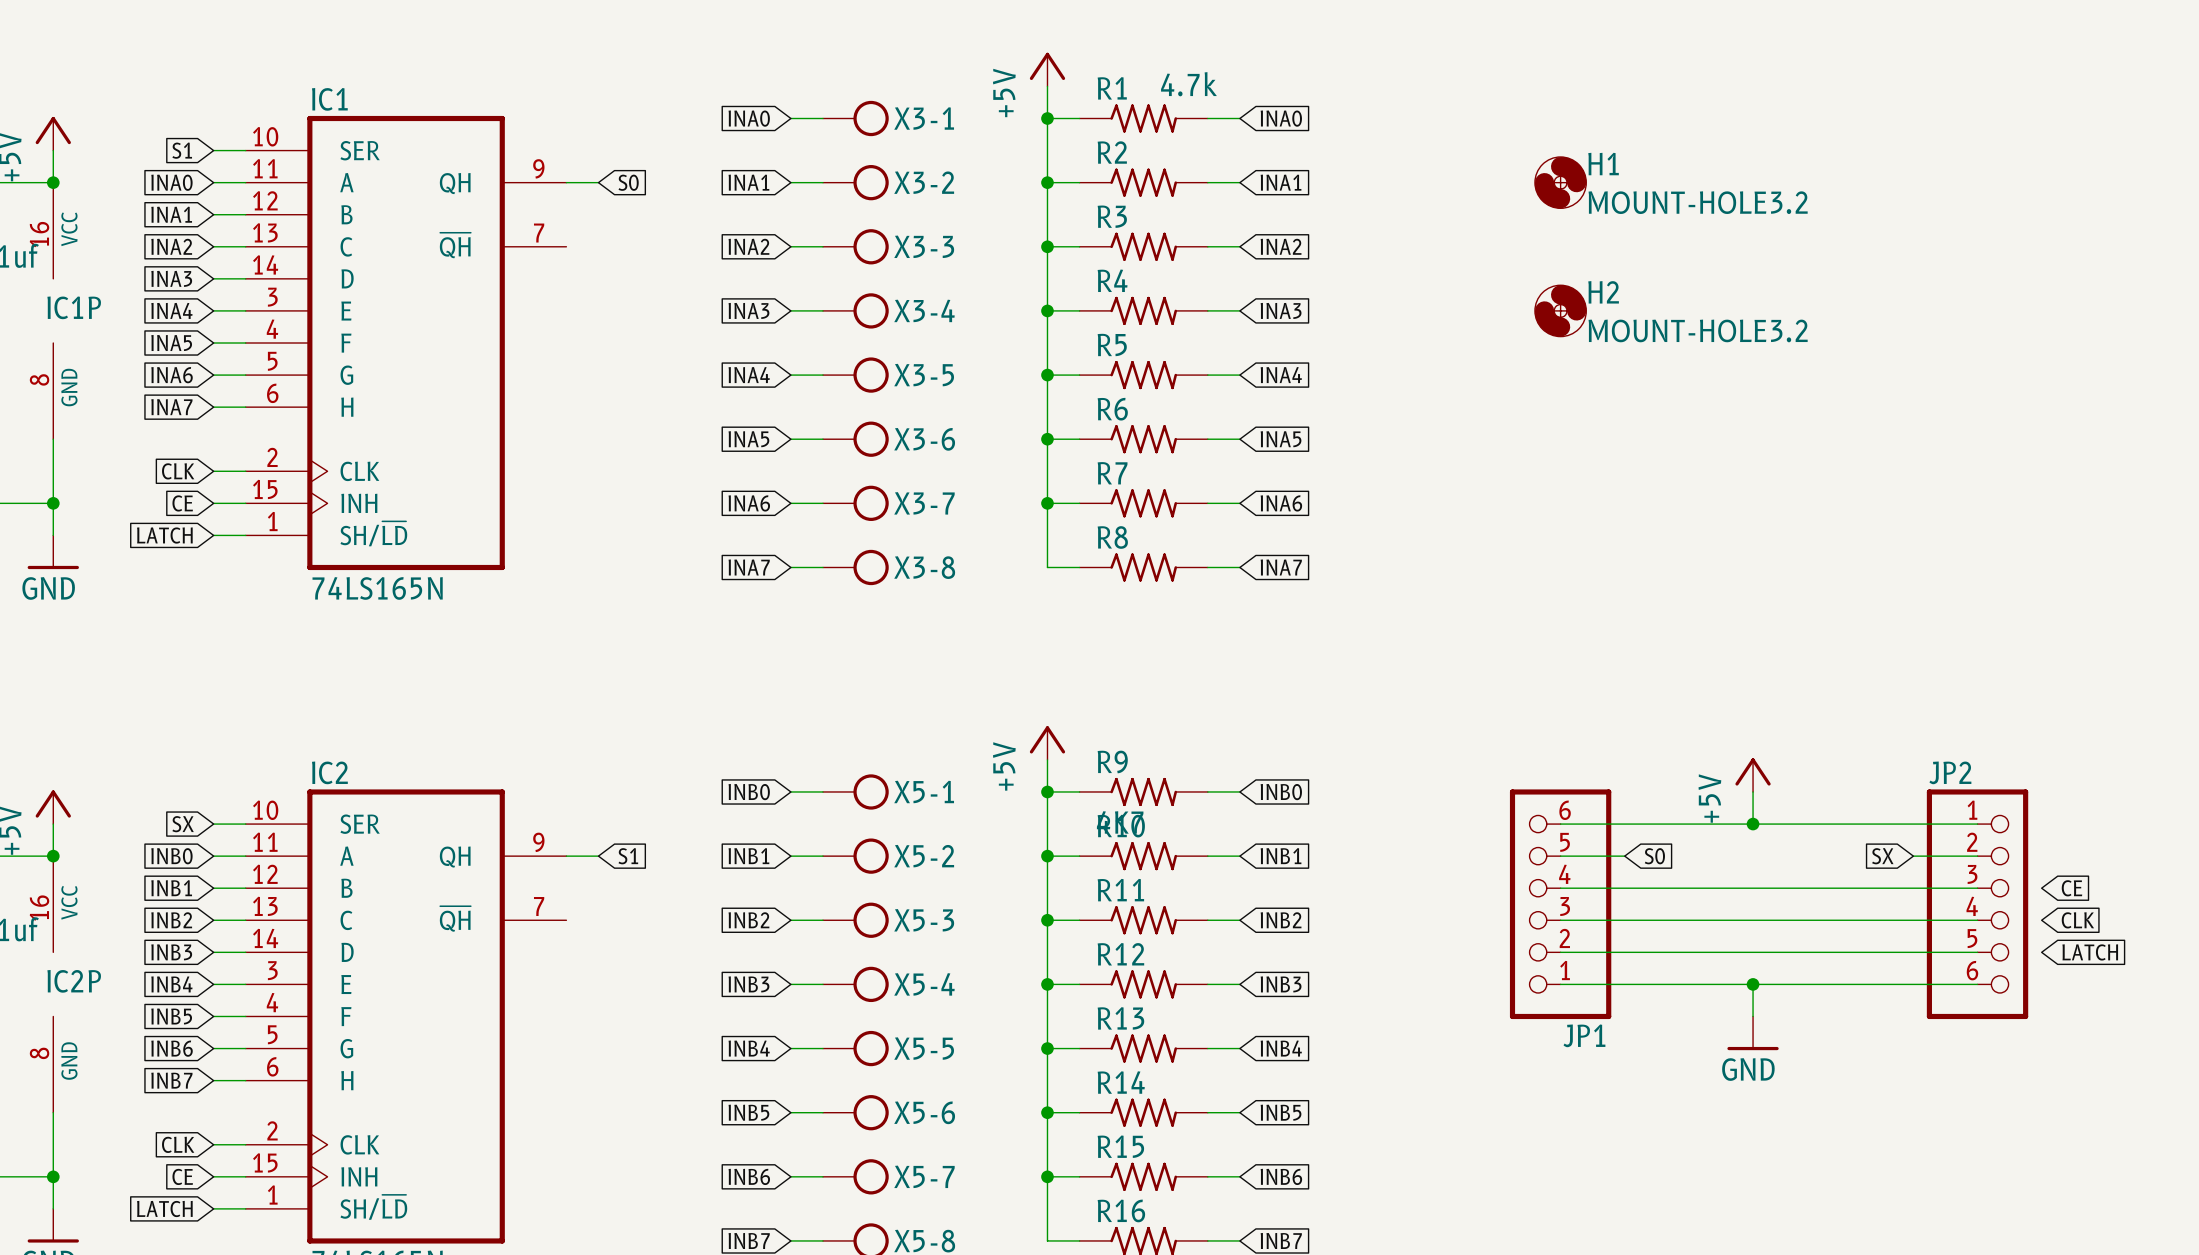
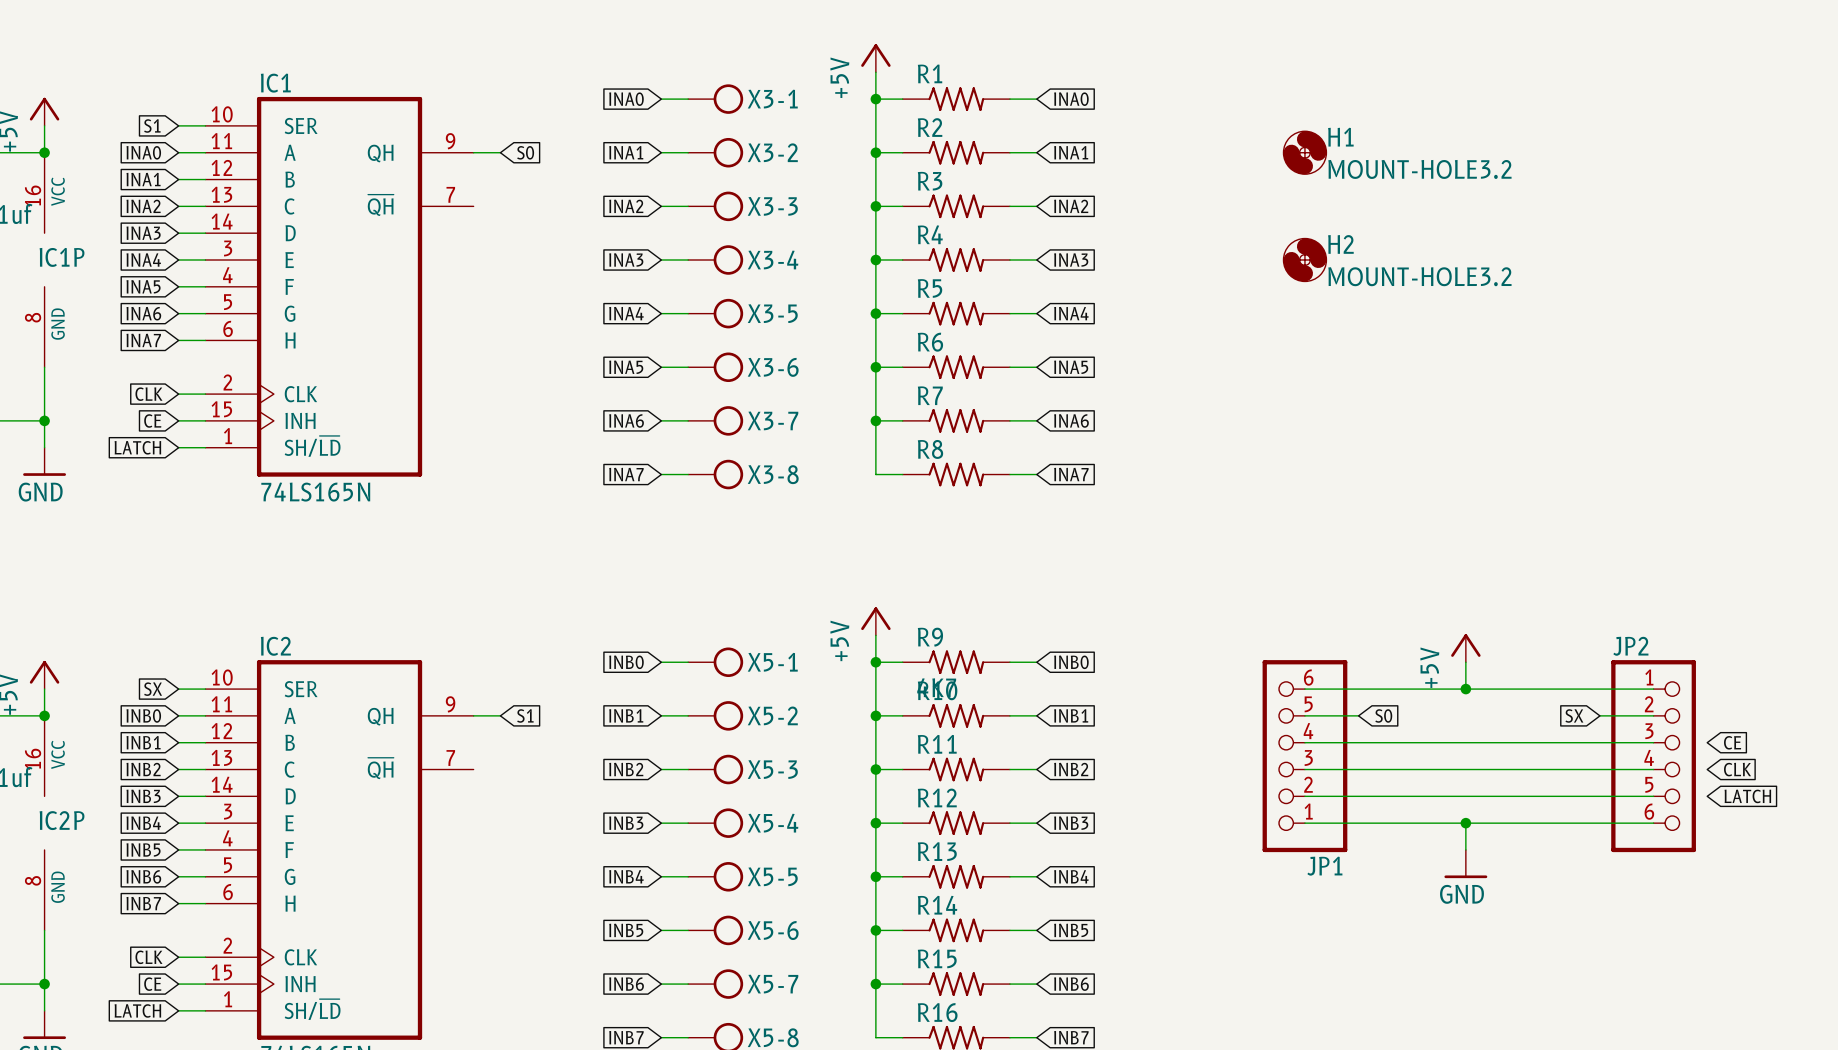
R1 value: 4.7k (1188, 84) -> none

